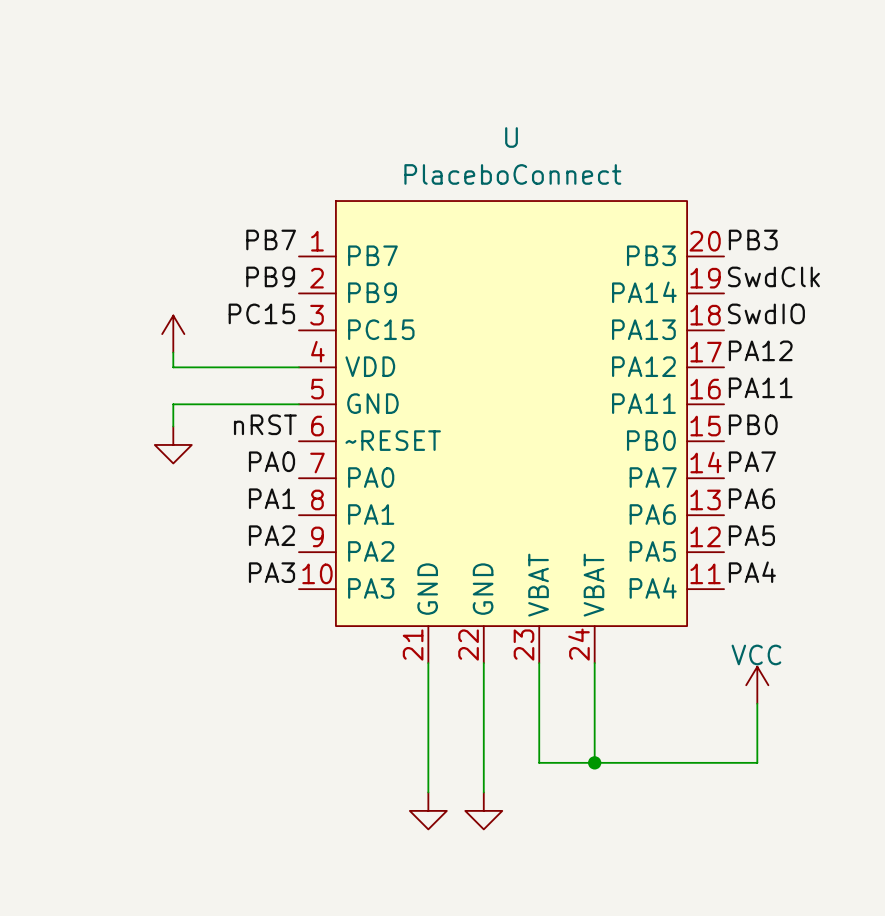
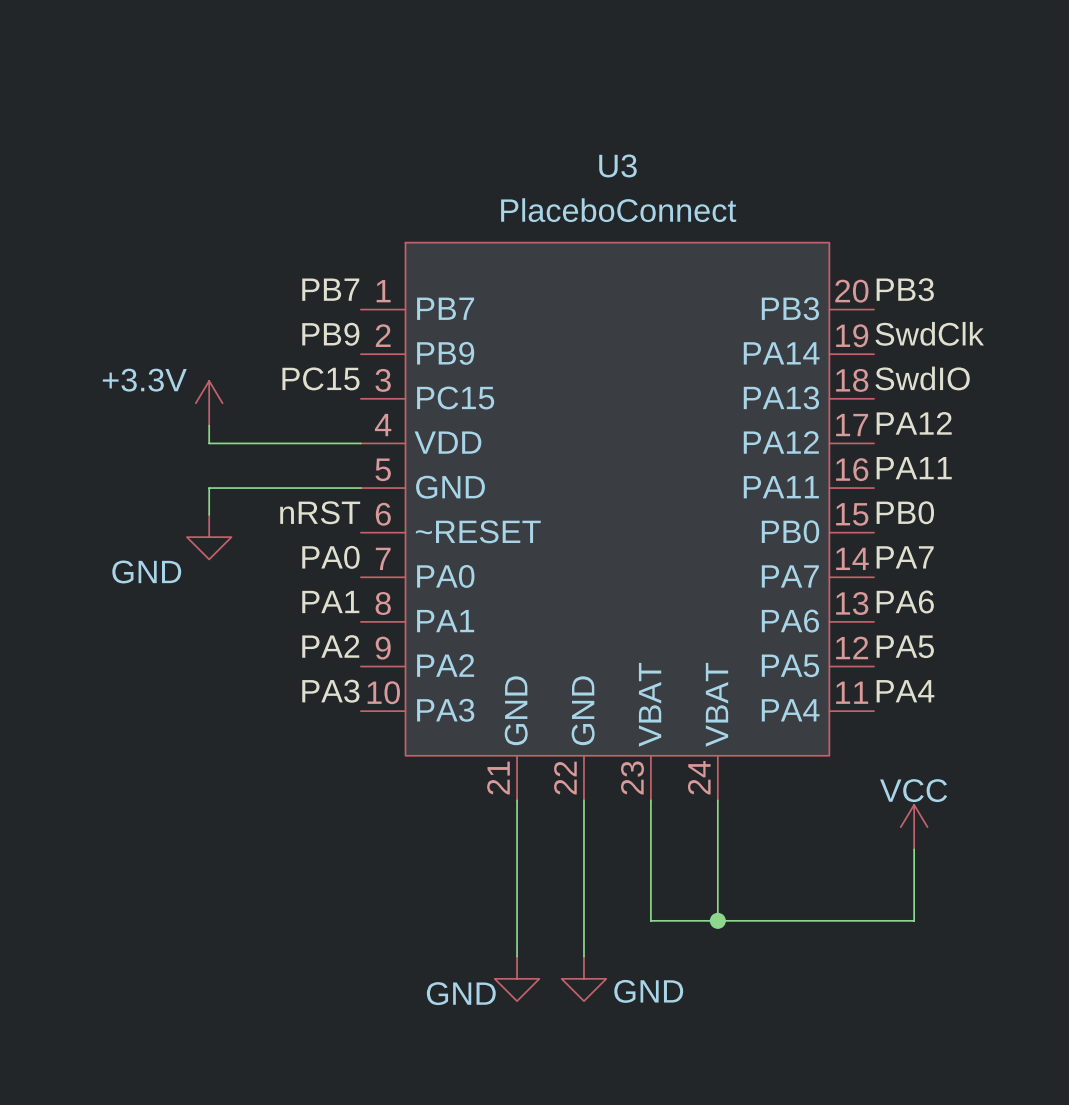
U name: U (511, 137) -> U3 (617, 165)
power symbol text: none -> +3.3V (144, 380)
power symbol text: none -> GND (146, 571)
power symbol text: none -> GND (648, 991)
power symbol text: none -> GND (461, 993)

